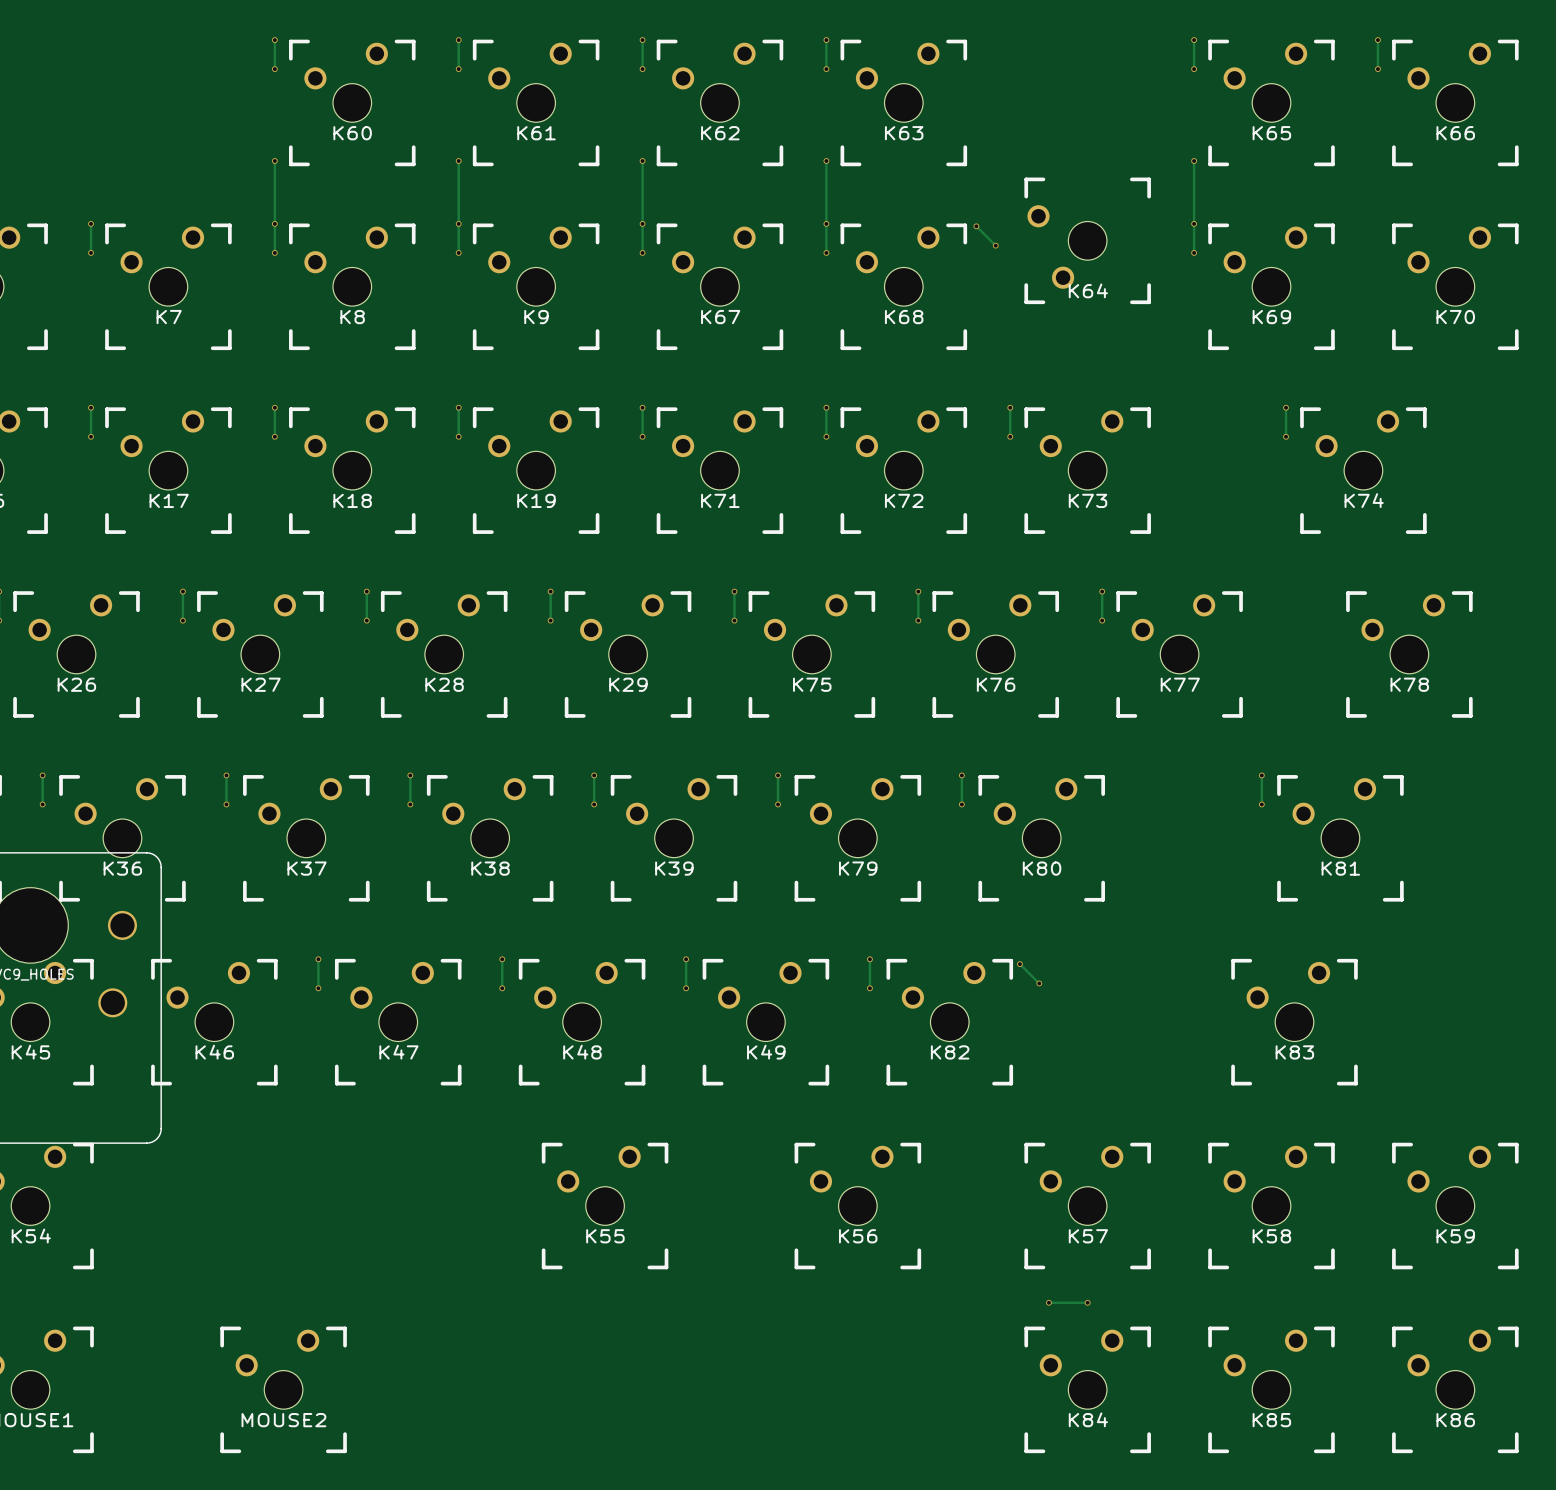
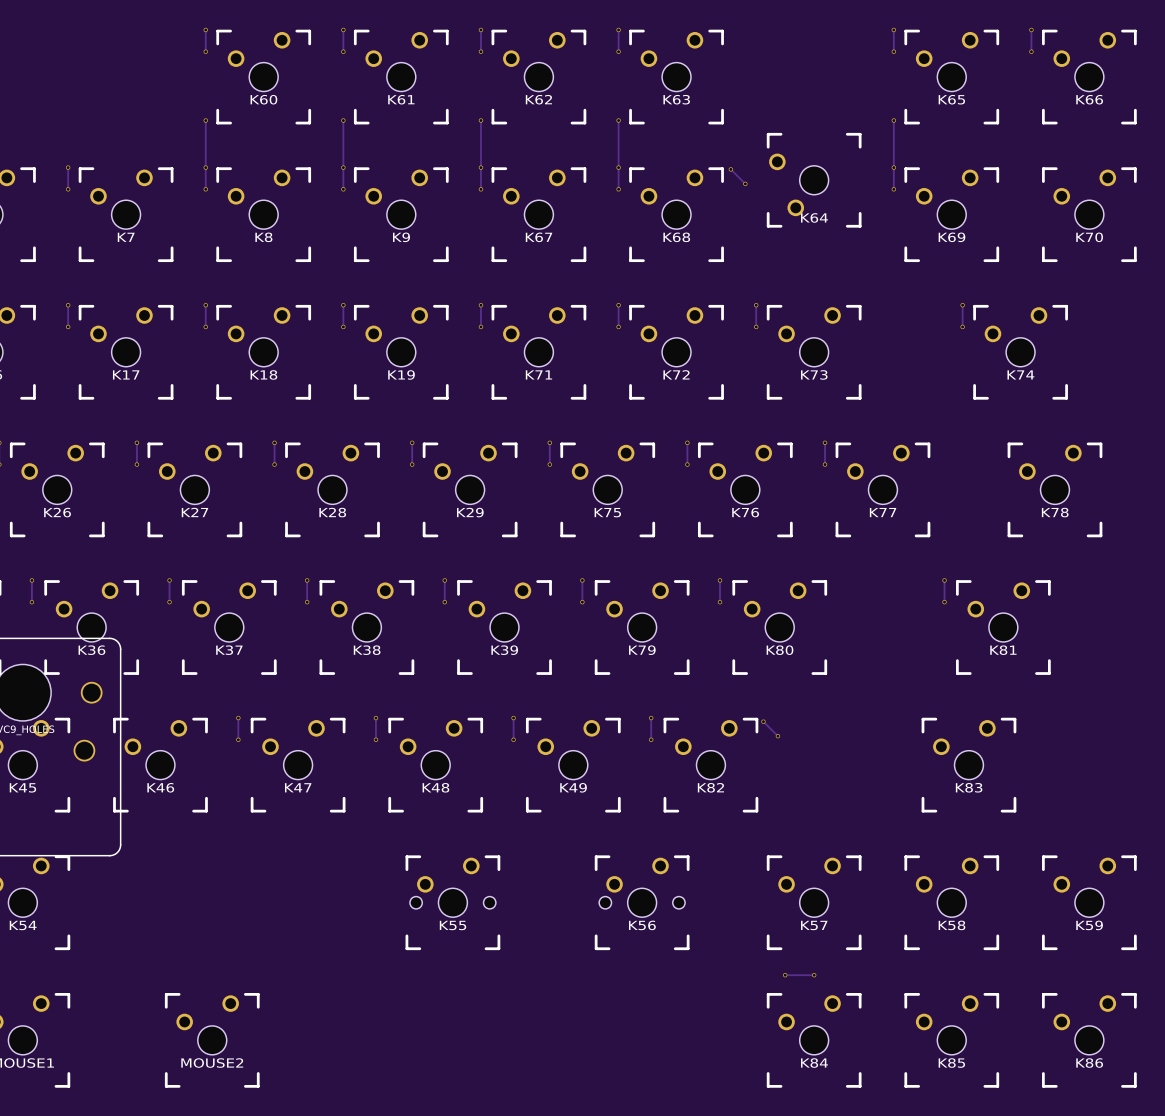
K55 footprint: [541, 1142, 669, 1270] -> [405, 855, 501, 951]
K56 footprint: [794, 1142, 922, 1270] -> [594, 855, 690, 951]

